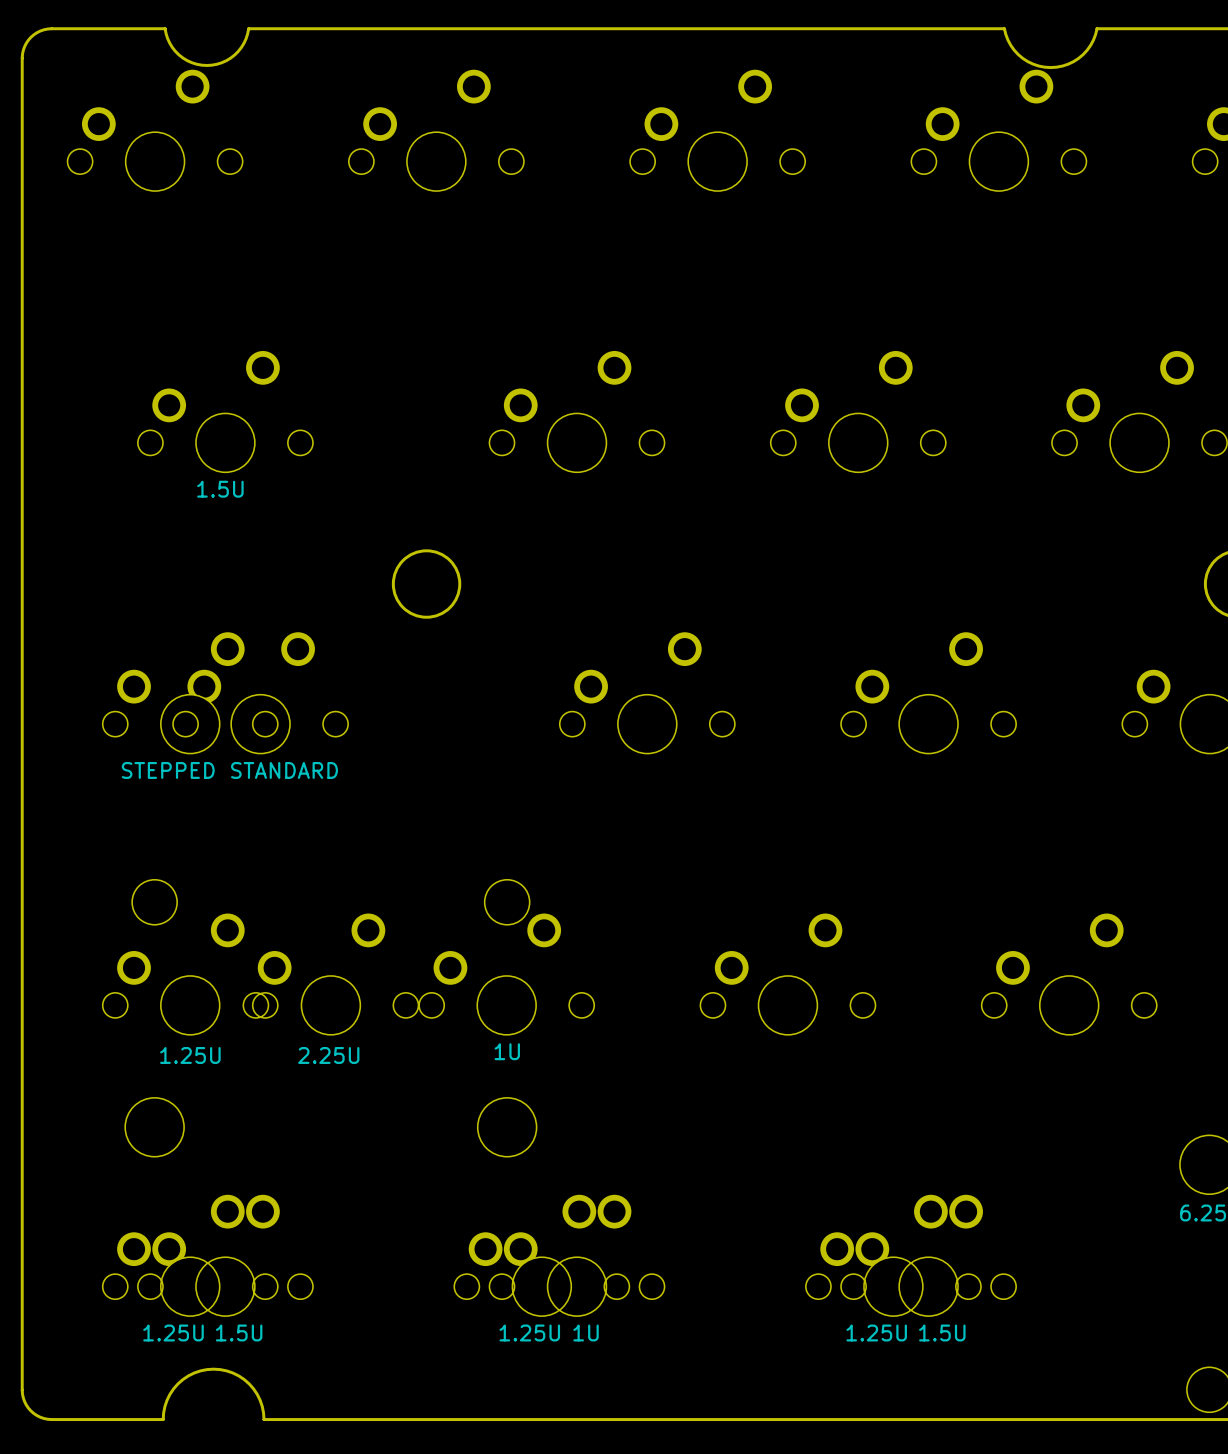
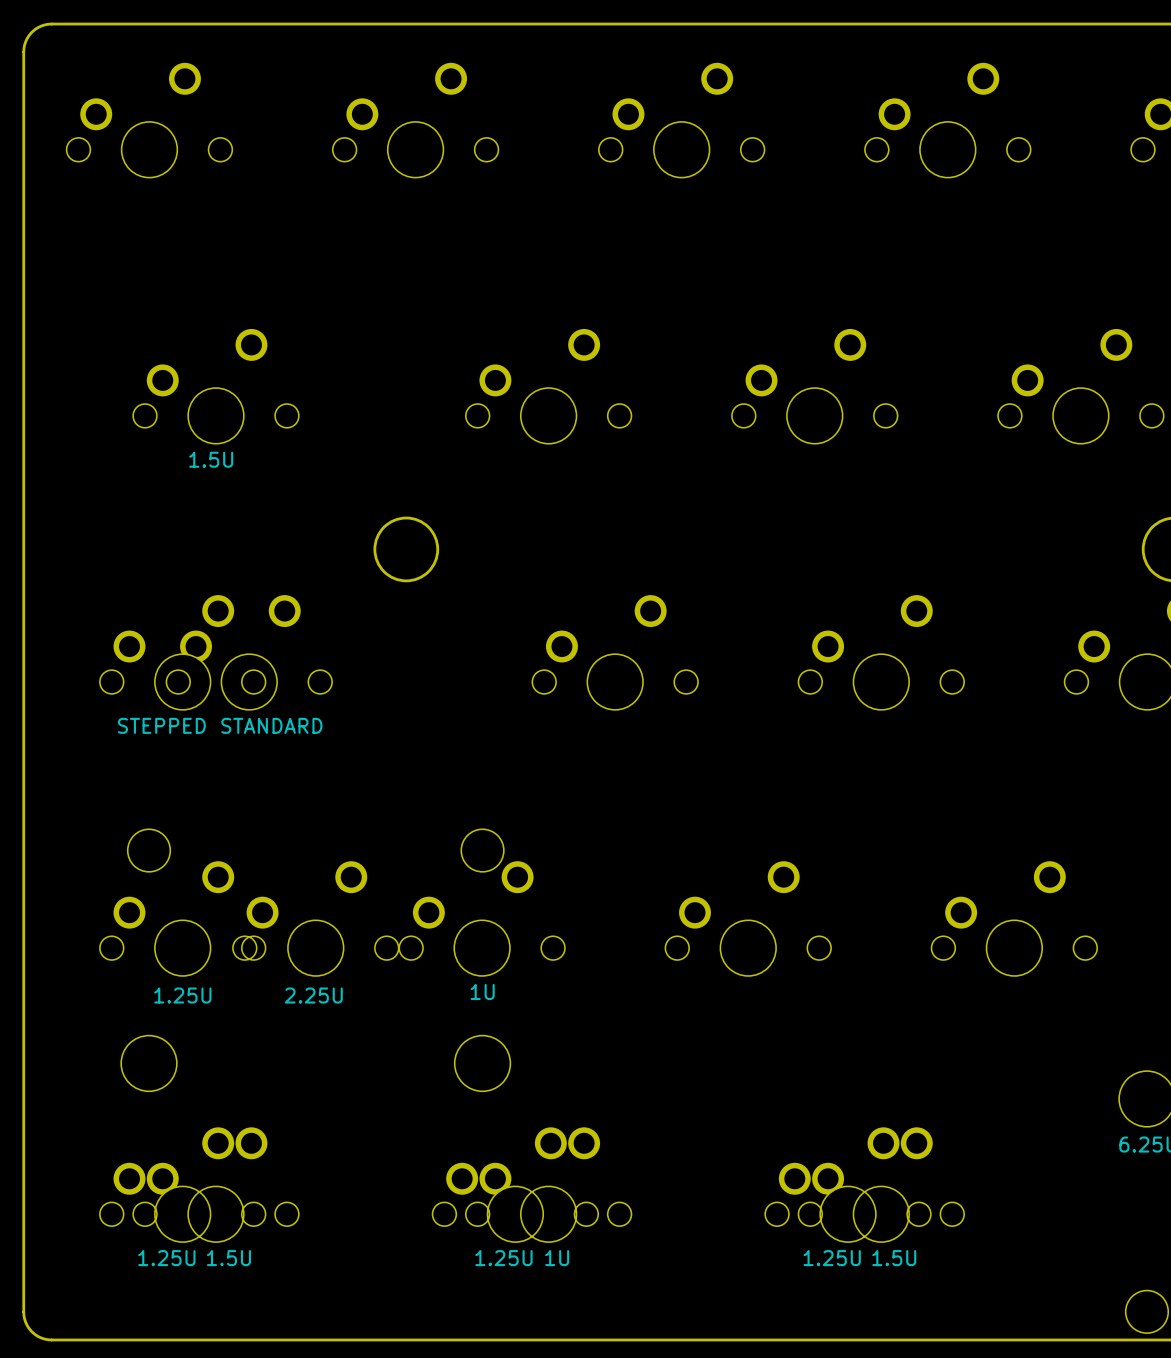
board edge: (165, 28) (169, 43) (179, 54) (192, 62) (206, 65) (221, 62) (234, 54) (244, 43) (248, 28) -> (158, 24) (237, 24)
board edge: (1004, 28) (1010, 45) (1022, 58) (1038, 66) (1050, 67) (1062, 66) (1078, 58) (1090, 45) (1097, 28) -> (953, 24) (1040, 24)
board edge: (163, 1419) (167, 1400) (177, 1383) (194, 1372) (213, 1369) (232, 1372) (249, 1383) (260, 1400) (263, 1419) -> (157, 1339) (252, 1339)

